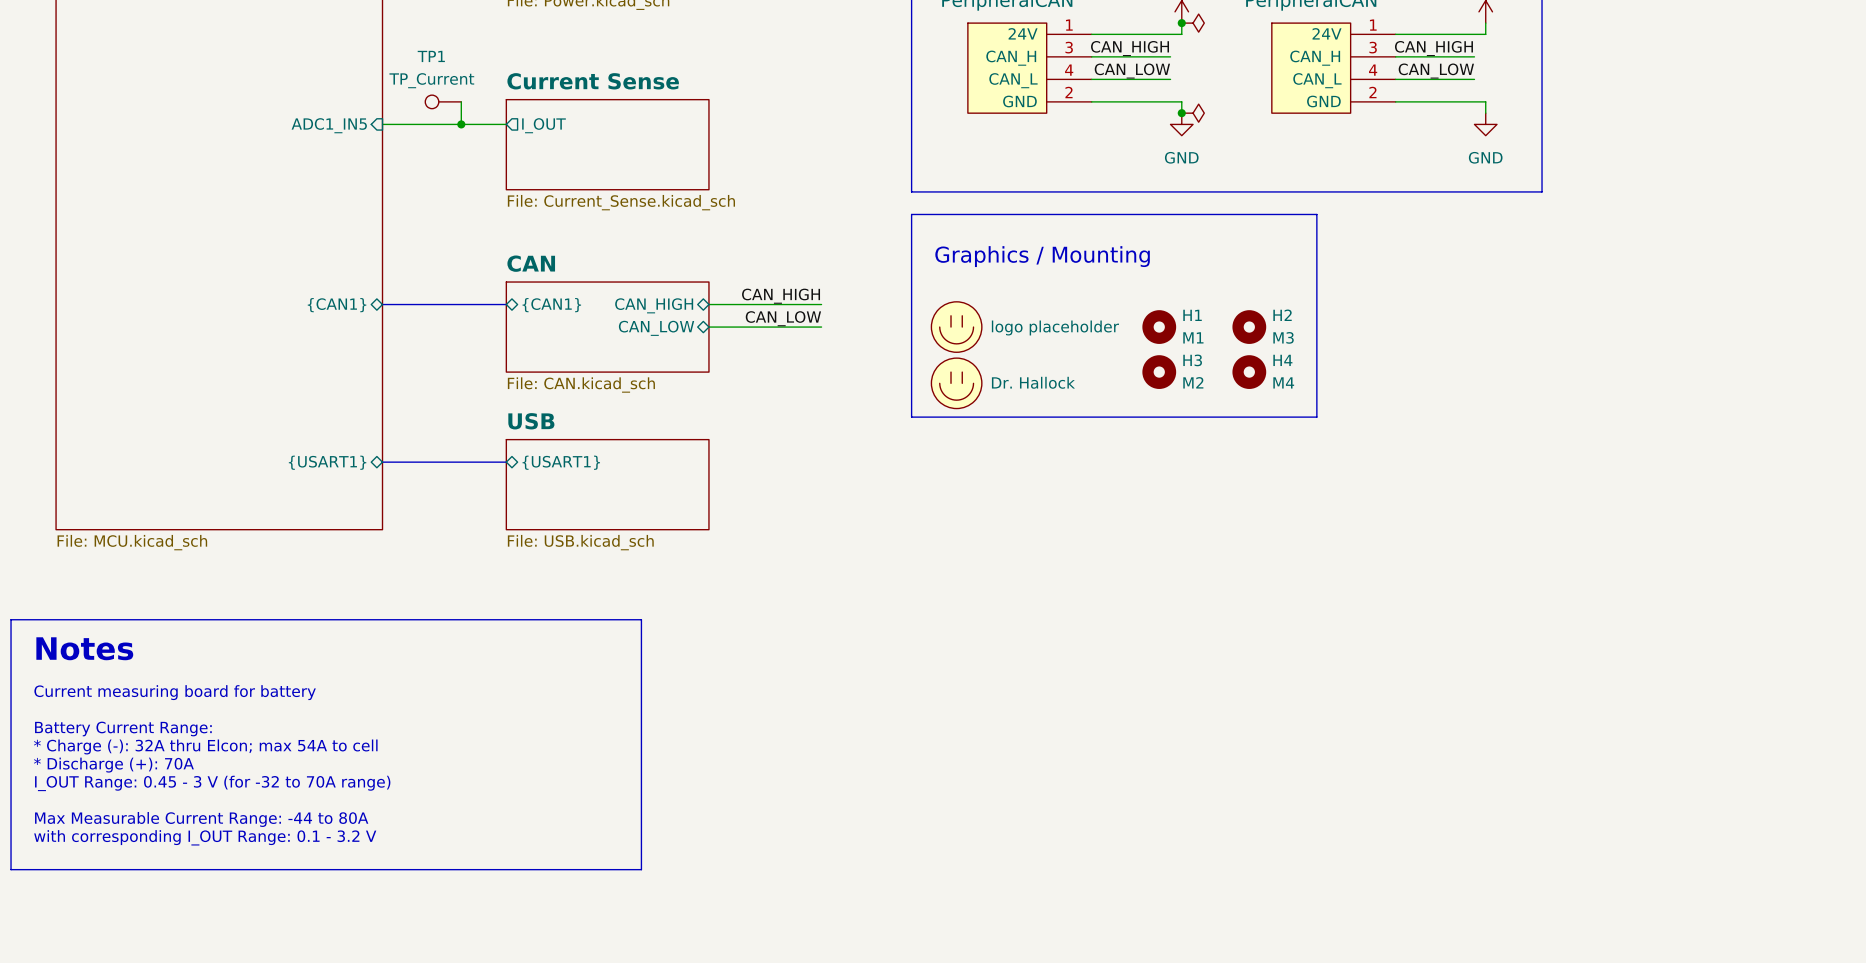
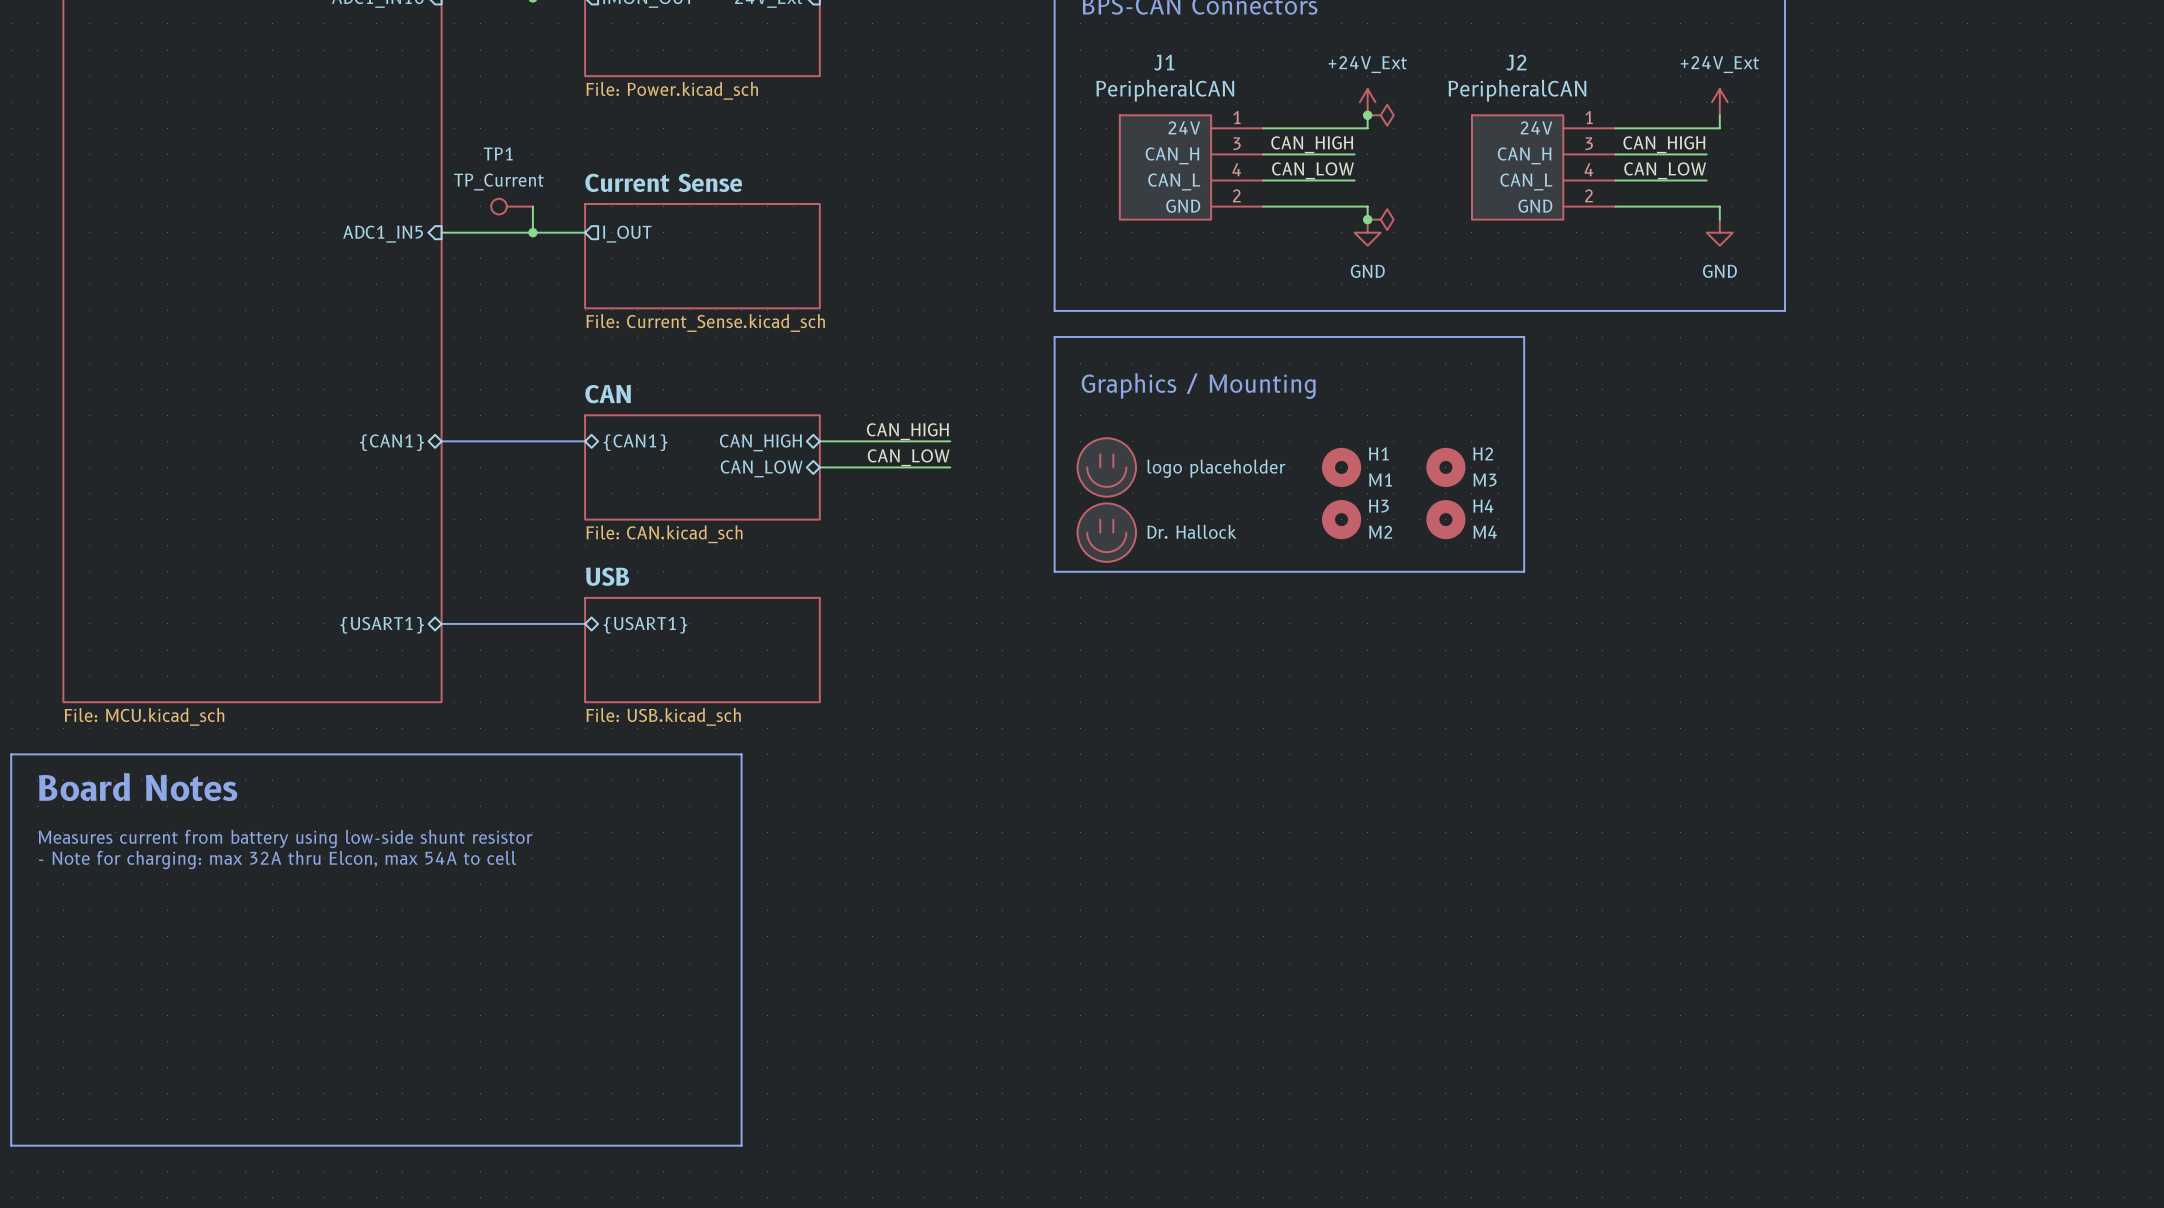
text: none -> Board Notes (138, 787)
line: (11, 619) (641, 619) -> (11, 806) (11, 754) (741, 754) (741, 806)
text: none -> Measures current from battery using low-side shunt resistor (285, 839)
text: Notes (84, 648) -> - Note for charging: max 32A thru Elcon, max 54A to cell (277, 860)
text: Current measuring board for battery (175, 692) -> none
text: Battery Current Range: (123, 728) -> none
text: * Charge (-): 32A thru Elcon; max 54A to cell (205, 746) -> none
text: * Discharge (+): 70A (113, 765) -> none
text: I_OUT Range: 0.45 - 3 V (for -32 to 70A range) (212, 783) -> none
text: Max Measurable Current Range: -44 to 80A (201, 819) -> none
text: with corresponding I_OUT Range: 0.1 - 3.2 V (205, 837) -> none
line: (11, 869) (641, 869) -> (11, 1096) (11, 1145) (741, 1145) (741, 1096)

